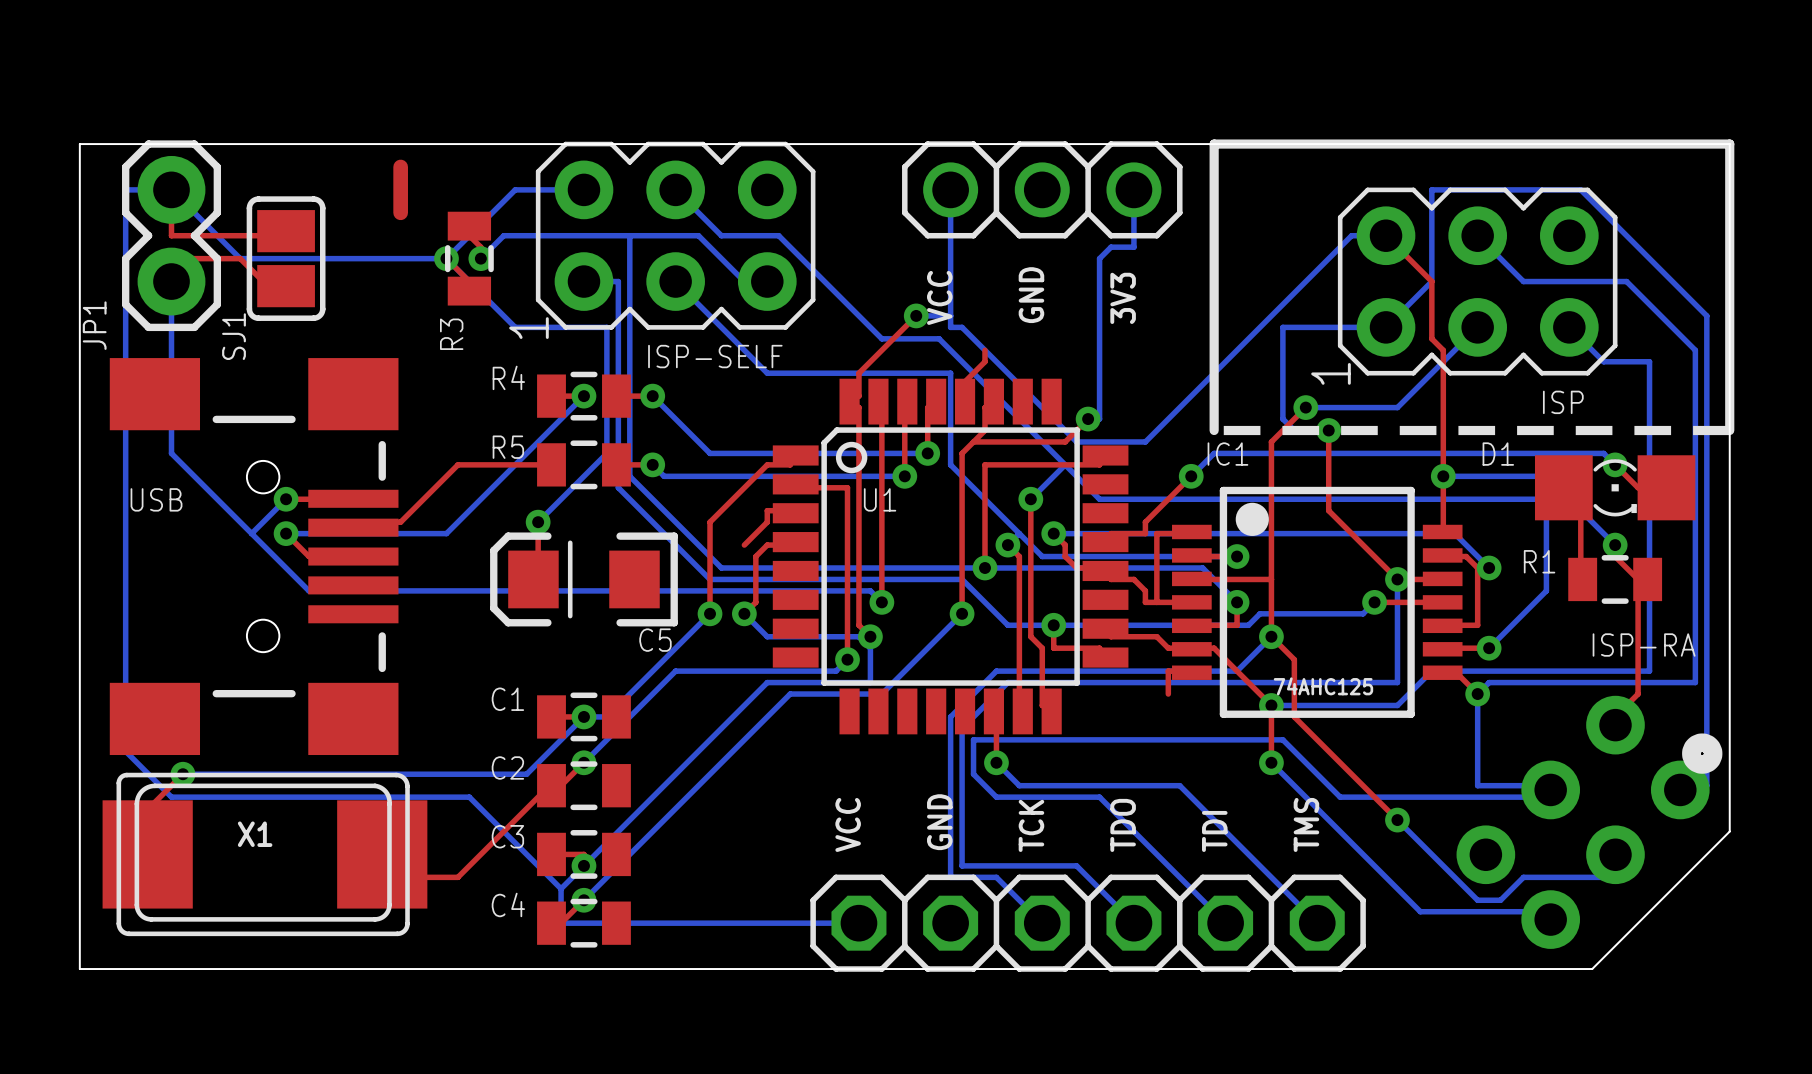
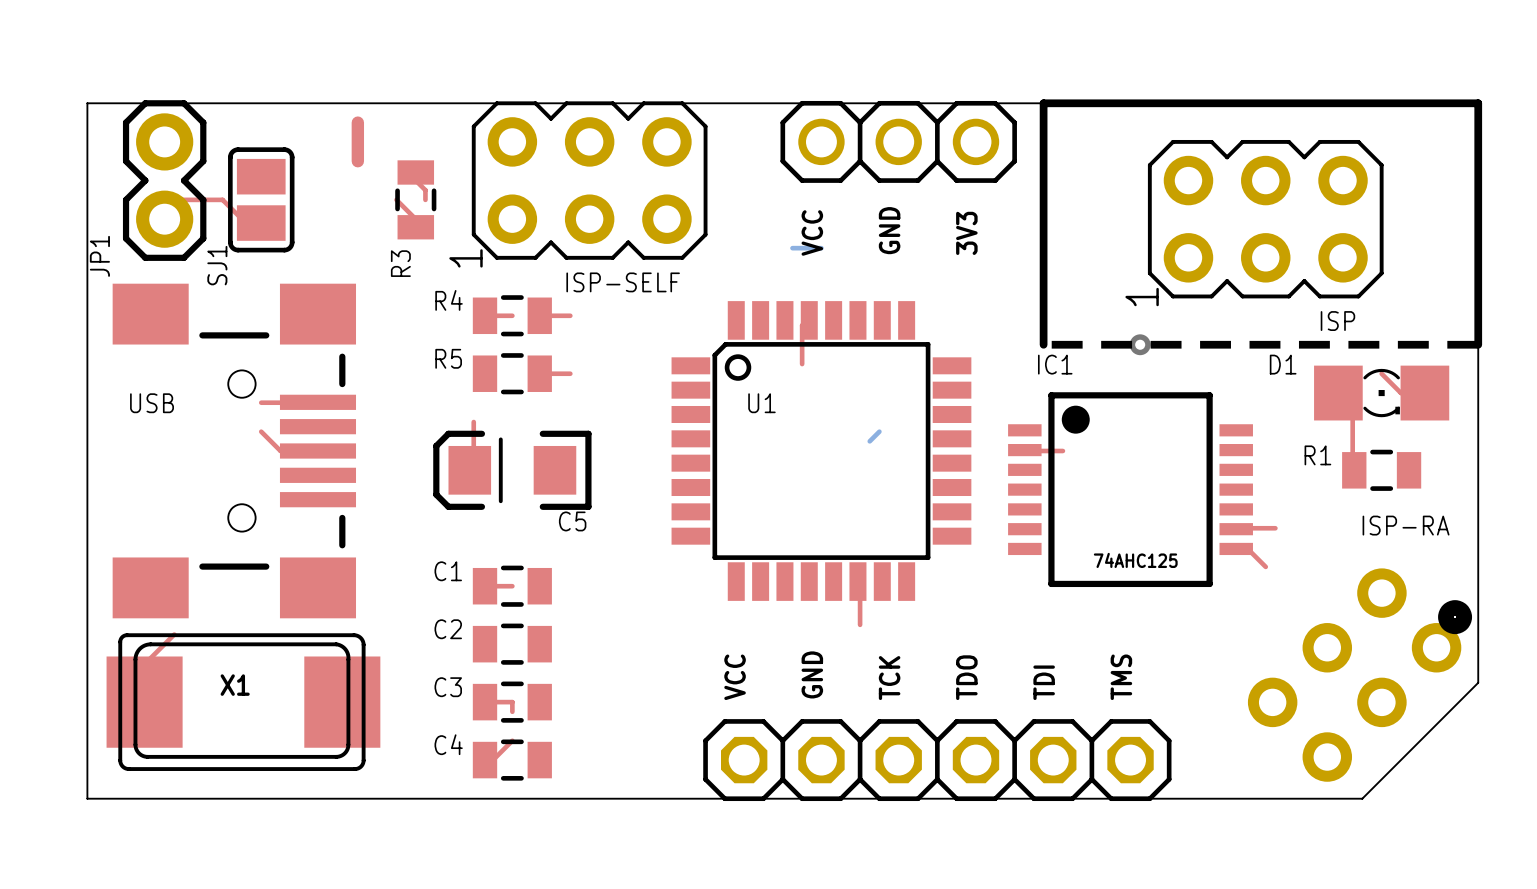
top track: (171, 189) (171, 235) (286, 235) (286, 231) -> none
bottom track: (583, 189) (515, 189) (446, 258) -> none
bottom track: (675, 189) (721, 235) (778, 235) (881, 338) (939, 338) (1099, 499) (1546, 499) (1546, 590) (1489, 648) -> none
bottom track: (950, 189) (950, 327) (962, 327) (1076, 441) (1145, 441) (1351, 235) (1386, 235) -> none
bottom track: (1133, 189) (1133, 247) (1111, 247) (1099, 258) (1099, 419) (1088, 419) -> none
bottom track: (629, 235) (629, 476) (721, 567) (1202, 567) (1237, 602) -> none
top track: (1386, 235) (1431, 281) (1431, 338) (1443, 350) (1443, 533) (1442, 532) -> none
bottom track: (1477, 235) (1523, 281) (1626, 281) (1695, 350) (1695, 682) (1489, 682) (1477, 694) (1477, 785) (1546, 785) (1550, 789) (1546, 797) (1340, 797) (1282, 739) (973, 739) (973, 774) (996, 797) (1099, 797) (1225, 923) -> none
bottom track: (446, 258) (515, 327) (606, 327) (606, 453) (538, 522) -> none
bottom track: (446, 258) (240, 258) (171, 189) (125, 189) (125, 751) (171, 797) (469, 797) (561, 888) -> none
via: (446, 258) -> none
bottom track: (480, 258) (503, 235) (698, 235) (744, 281) (767, 281) -> none
via: (480, 258) -> none
bottom track: (171, 281) (171, 453) (308, 590) (870, 590) (881, 602) -> none
bottom track: (583, 281) (618, 281) (618, 487) (710, 579) (962, 579) (1007, 625) (1248, 625) (1259, 613) (1363, 613) (1374, 602) -> none
bottom track: (675, 281) (767, 373) (950, 373) (950, 464) (1042, 556) (1237, 556) -> none
top track: (916, 315) (858, 373) (858, 396) (849, 401) (858, 407) (858, 625) (870, 636) -> none
via: (916, 315) -> none
bottom track: (1477, 327) (1397, 407) (1305, 407) -> none
bottom track: (1569, 327) (1603, 361) (1649, 361) (1649, 671) (1431, 671) (1397, 705) (1271, 705) -> none
top track: (984, 350) (984, 361) (962, 384) (962, 396) (965, 401) -> none
bottom track: (583, 396) (446, 533) (286, 533) -> none
via: (583, 396) -> none
bottom track: (652, 396) (710, 453) (927, 453) -> none
via: (652, 396) -> none
top track: (878, 401) (881, 407) (881, 602) -> none
top track: (907, 401) (904, 407) (904, 476) -> none
top track: (993, 401) (984, 407) (984, 430) (962, 453) (962, 613) -> none
top track: (1305, 407) (1271, 441) (1271, 636) (1294, 659) (1294, 716) (1397, 820) -> none
via: (1305, 407) -> none
top track: (1088, 419) (1065, 441) (973, 441) -> none
via: (1088, 419) -> none
top track: (1328, 430) (1328, 510) (1397, 579) (1442, 578) -> none
bottom track: (1328, 430) (1294, 430) (1282, 419) (1282, 327) (1386, 327) (1431, 281) (1431, 189) (1580, 189) (1706, 315) (1706, 785) (1683, 785) (1680, 789) -> none
via: (927, 453) -> none
top track: (795, 455) (790, 464) (767, 464) (710, 522) (710, 613) -> none
top track: (1105, 455) (1099, 464) (984, 464) (984, 567) -> none
top track: (551, 464) (457, 464) (400, 522) (354, 522) (353, 527) -> none
bottom track: (652, 464) (664, 476) (904, 476) -> none
via: (652, 464) -> none
bottom track: (1065, 464) (1030, 499) -> none
bottom track: (1615, 464) (1603, 453) (1214, 453) (1191, 476) -> none
via: (1615, 464) -> none
via: (904, 476) -> none
top track: (1191, 476) (1145, 522) (1145, 533) (1111, 533) (1105, 542) -> none
via: (1191, 476) -> none
bottom track: (1443, 476) (1546, 476) (1615, 545) -> none
via: (1443, 476) -> none
top track: (795, 484) (801, 487) (847, 487) (847, 659) -> none
bottom track: (286, 499) (251, 533) -> none
via: (286, 499) -> none
top track: (1030, 499) (1030, 636) (1042, 648) (1042, 705) (1051, 711) -> none
via: (1030, 499) -> none
top track: (795, 513) (790, 510) (767, 510) (767, 522) (744, 545) -> none
via: (538, 522) -> none
top track: (1191, 532) (1191, 533) (1156, 533) (1156, 602) -> none
via: (286, 533) -> none
top track: (1053, 533) (1065, 545) (1065, 556) (1076, 567) (1099, 567) (1105, 570) (1111, 579) (1133, 579) (1145, 590) (1145, 602) (1191, 602) -> none
bottom track: (1053, 533) (1454, 533) (1489, 567) -> none
via: (1053, 533) -> none
top track: (795, 542) (790, 545) (767, 545) (755, 556) (755, 602) (744, 613) -> none
top track: (1007, 545) (1019, 556) (1019, 705) (1022, 711) -> none
via: (1007, 545) -> none
top track: (1615, 545) (1615, 556) (1638, 579) -> none
via: (1615, 545) -> none
top track: (1442, 555) (1466, 556) (1477, 567) -> none
via: (1237, 556) -> none
via: (984, 567) -> none
top track: (1477, 567) (1477, 625) (1442, 625) -> none
via: (1489, 567) -> none
top track: (1191, 578) (1271, 579) -> none
bottom track: (1397, 579) (1397, 682) (1007, 682) (962, 728) (962, 865) (1076, 865) (1133, 923) -> none
via: (1397, 579) -> none
top track: (1638, 579) (1638, 694) (1626, 705) (1626, 716) (1615, 725) -> none
via: (881, 602) -> none
top track: (1237, 602) (1237, 625) (1191, 625) -> none
via: (1237, 602) -> none
top track: (1374, 602) (1442, 602) -> none
via: (1374, 602) -> none
bottom track: (710, 613) (606, 716) (583, 716) (526, 774) (182, 774) -> none
via: (710, 613) -> none
bottom track: (744, 613) (767, 636) (870, 636) -> none
via: (744, 613) -> none
bottom track: (962, 613) (881, 694) (790, 694) (583, 900) -> none
via: (962, 613) -> none
top track: (1053, 625) (1053, 648) (1099, 648) (1105, 657) -> none
via: (1053, 625) -> none
top track: (1105, 628) (1111, 636) (1156, 636) (1168, 648) (1214, 648) (1271, 705) (1271, 762) -> none
bottom track: (858, 636) (870, 648) (870, 682) (767, 682) (561, 888) -> none
via: (870, 636) -> none
bottom track: (1271, 636) (1237, 671) (996, 671) (950, 716) (950, 877) (996, 877) (1042, 923) -> none
via: (1271, 636) -> none
via: (1489, 648) -> none
bottom track: (847, 659) (836, 671) (675, 671) (583, 762) -> none
via: (847, 659) -> none
top track: (1191, 672) (1191, 671) (1168, 671) (1168, 694) -> none
via: (1477, 694) -> none
via: (1271, 705) -> none
via: (583, 716) -> none
top track: (583, 762) (561, 785) (549, 785) (457, 877) (389, 877) (389, 854) (382, 854) -> none
via: (583, 762) -> none
bottom track: (996, 762) (1019, 785) (1179, 785) (1317, 923) -> none
via: (996, 762) -> none
bottom track: (1271, 762) (1420, 911) (1546, 911) (1550, 919) -> none
via: (1271, 762) -> none
via: (182, 774) -> none
bottom track: (1397, 820) (1477, 900) (1500, 900) (1523, 877) (1603, 877) (1615, 865) (1615, 854) -> none
via: (1397, 820) -> none
via: (583, 865) -> none
bottom track: (561, 888) (561, 923) (858, 923) -> none
via: (583, 900) -> none

